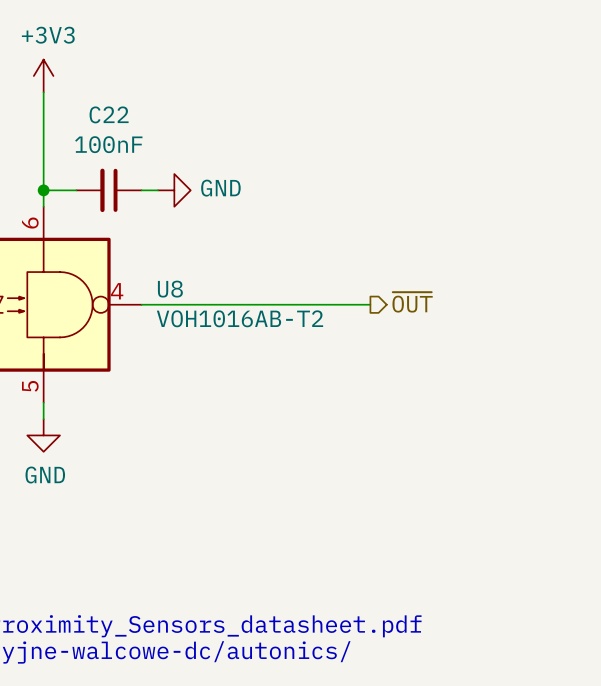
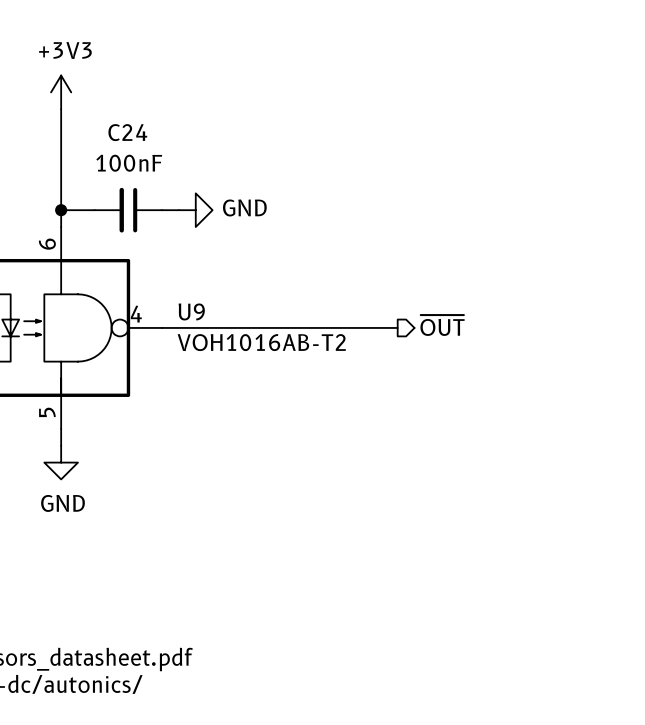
C22 name: C22 (109, 114) -> C24 (127, 132)
U8 name: U8 (170, 289) -> U9 (191, 311)

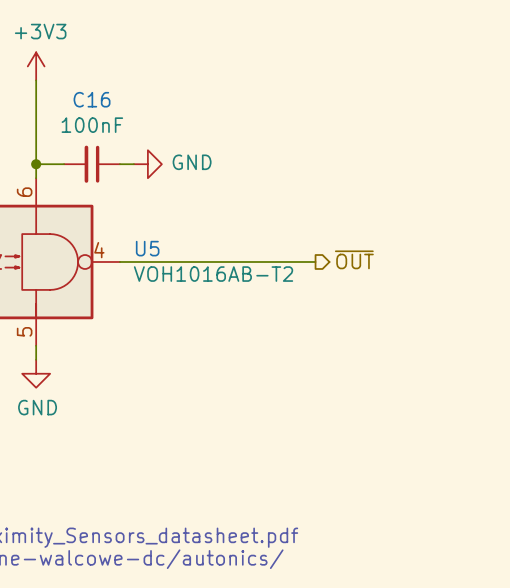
C24 name: C24 (127, 132) -> C16 (92, 99)
U9 name: U9 (191, 311) -> U5 (147, 248)

